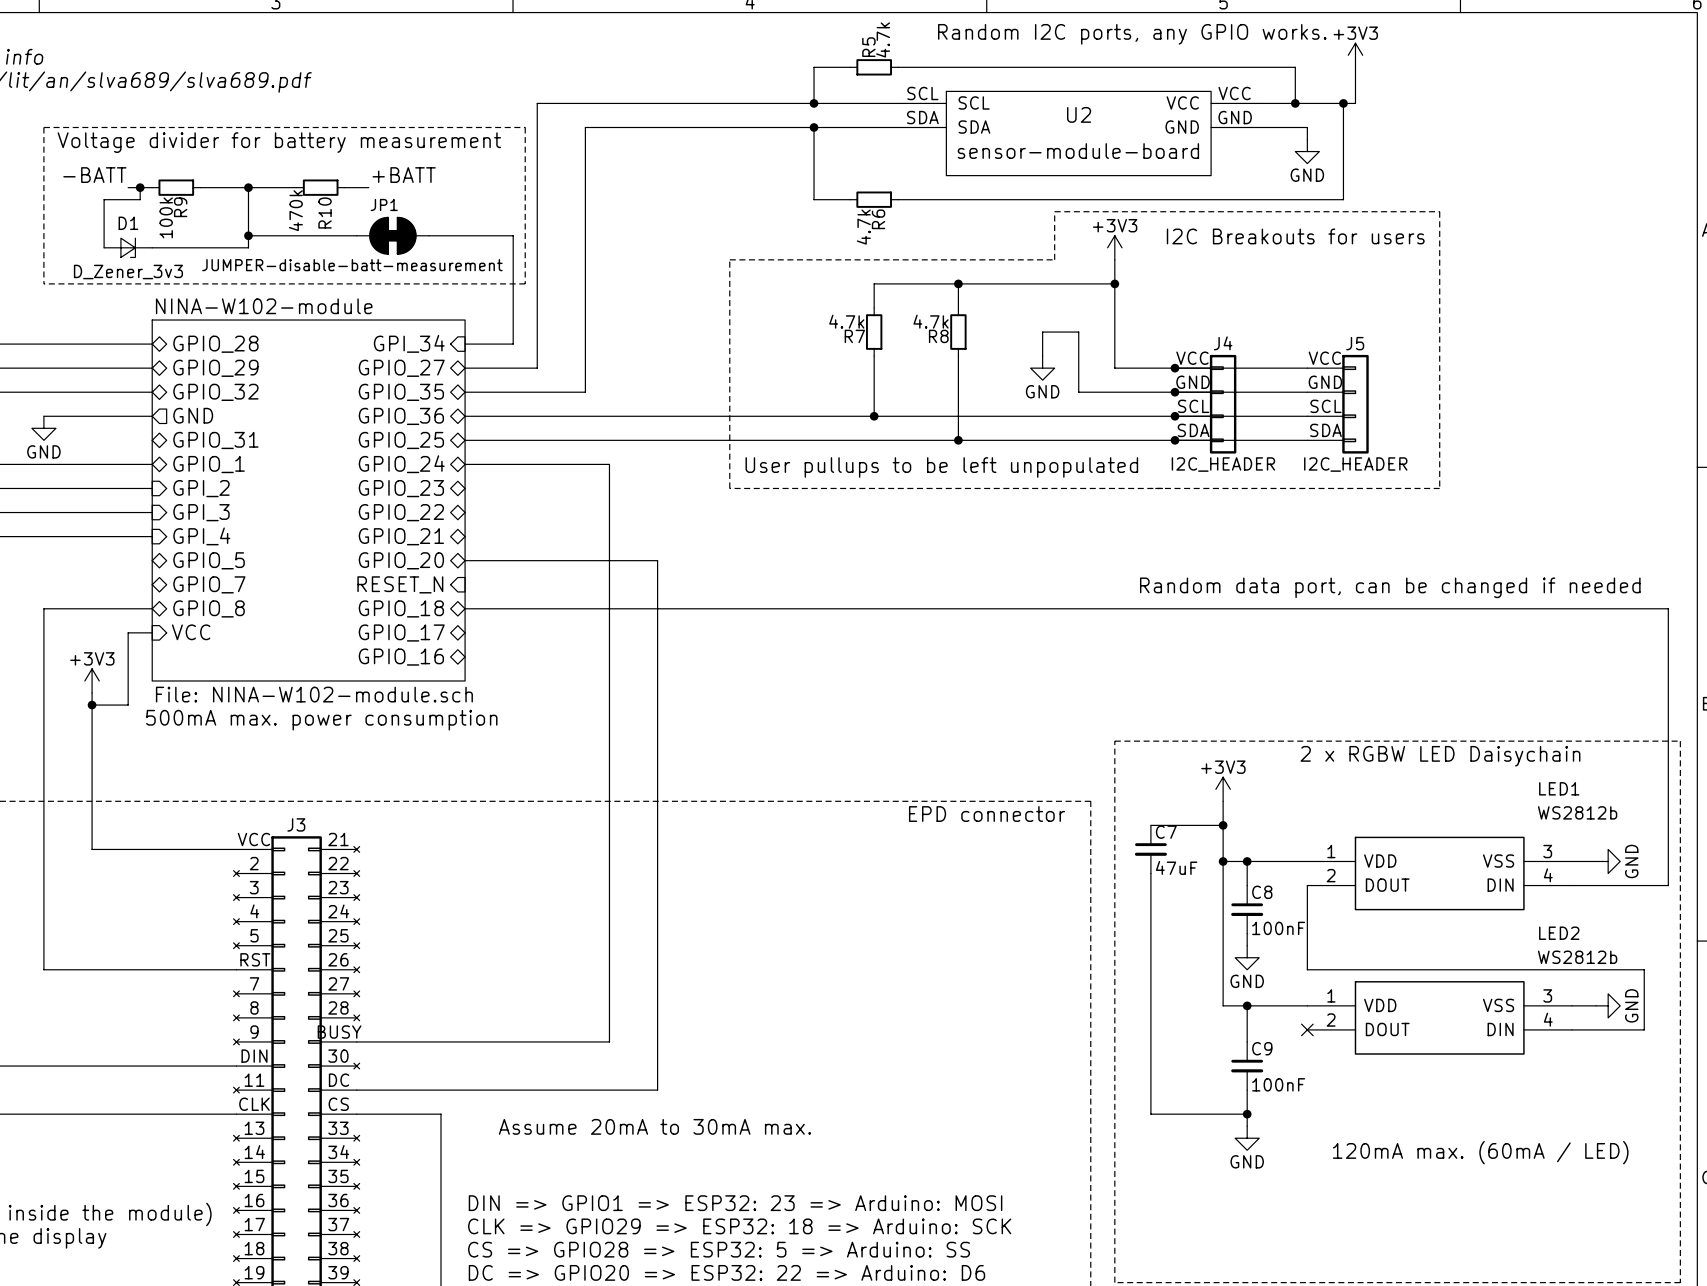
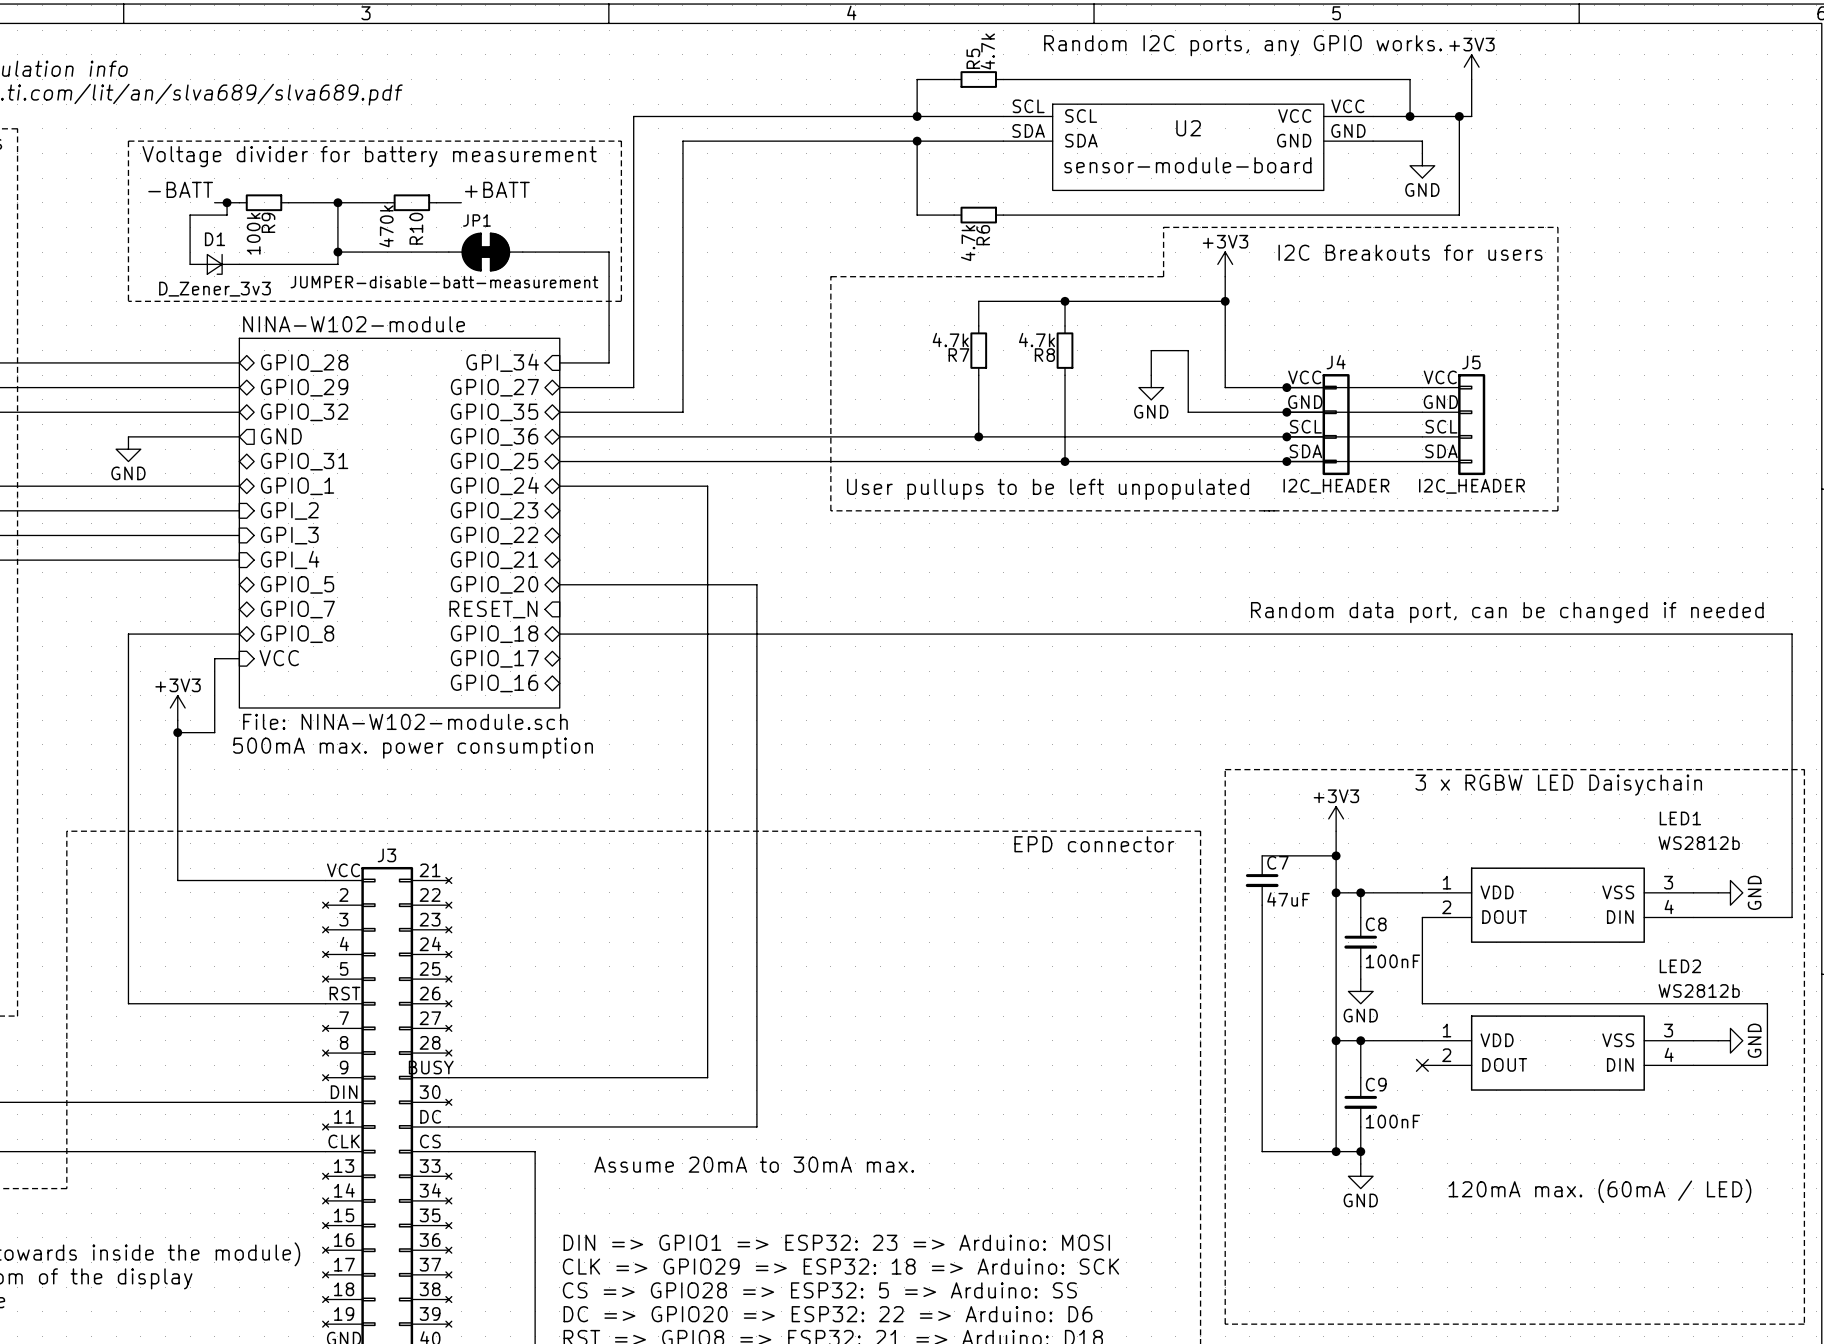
text: 2 x RGBW LED Daisychain (1440, 756) -> 3 x RGBW LED Daisychain (1558, 785)
wire: none -> (1336, 1040) (1336, 1151)
junction: none -> (1336, 1040)
junction: none -> (1336, 1151)

